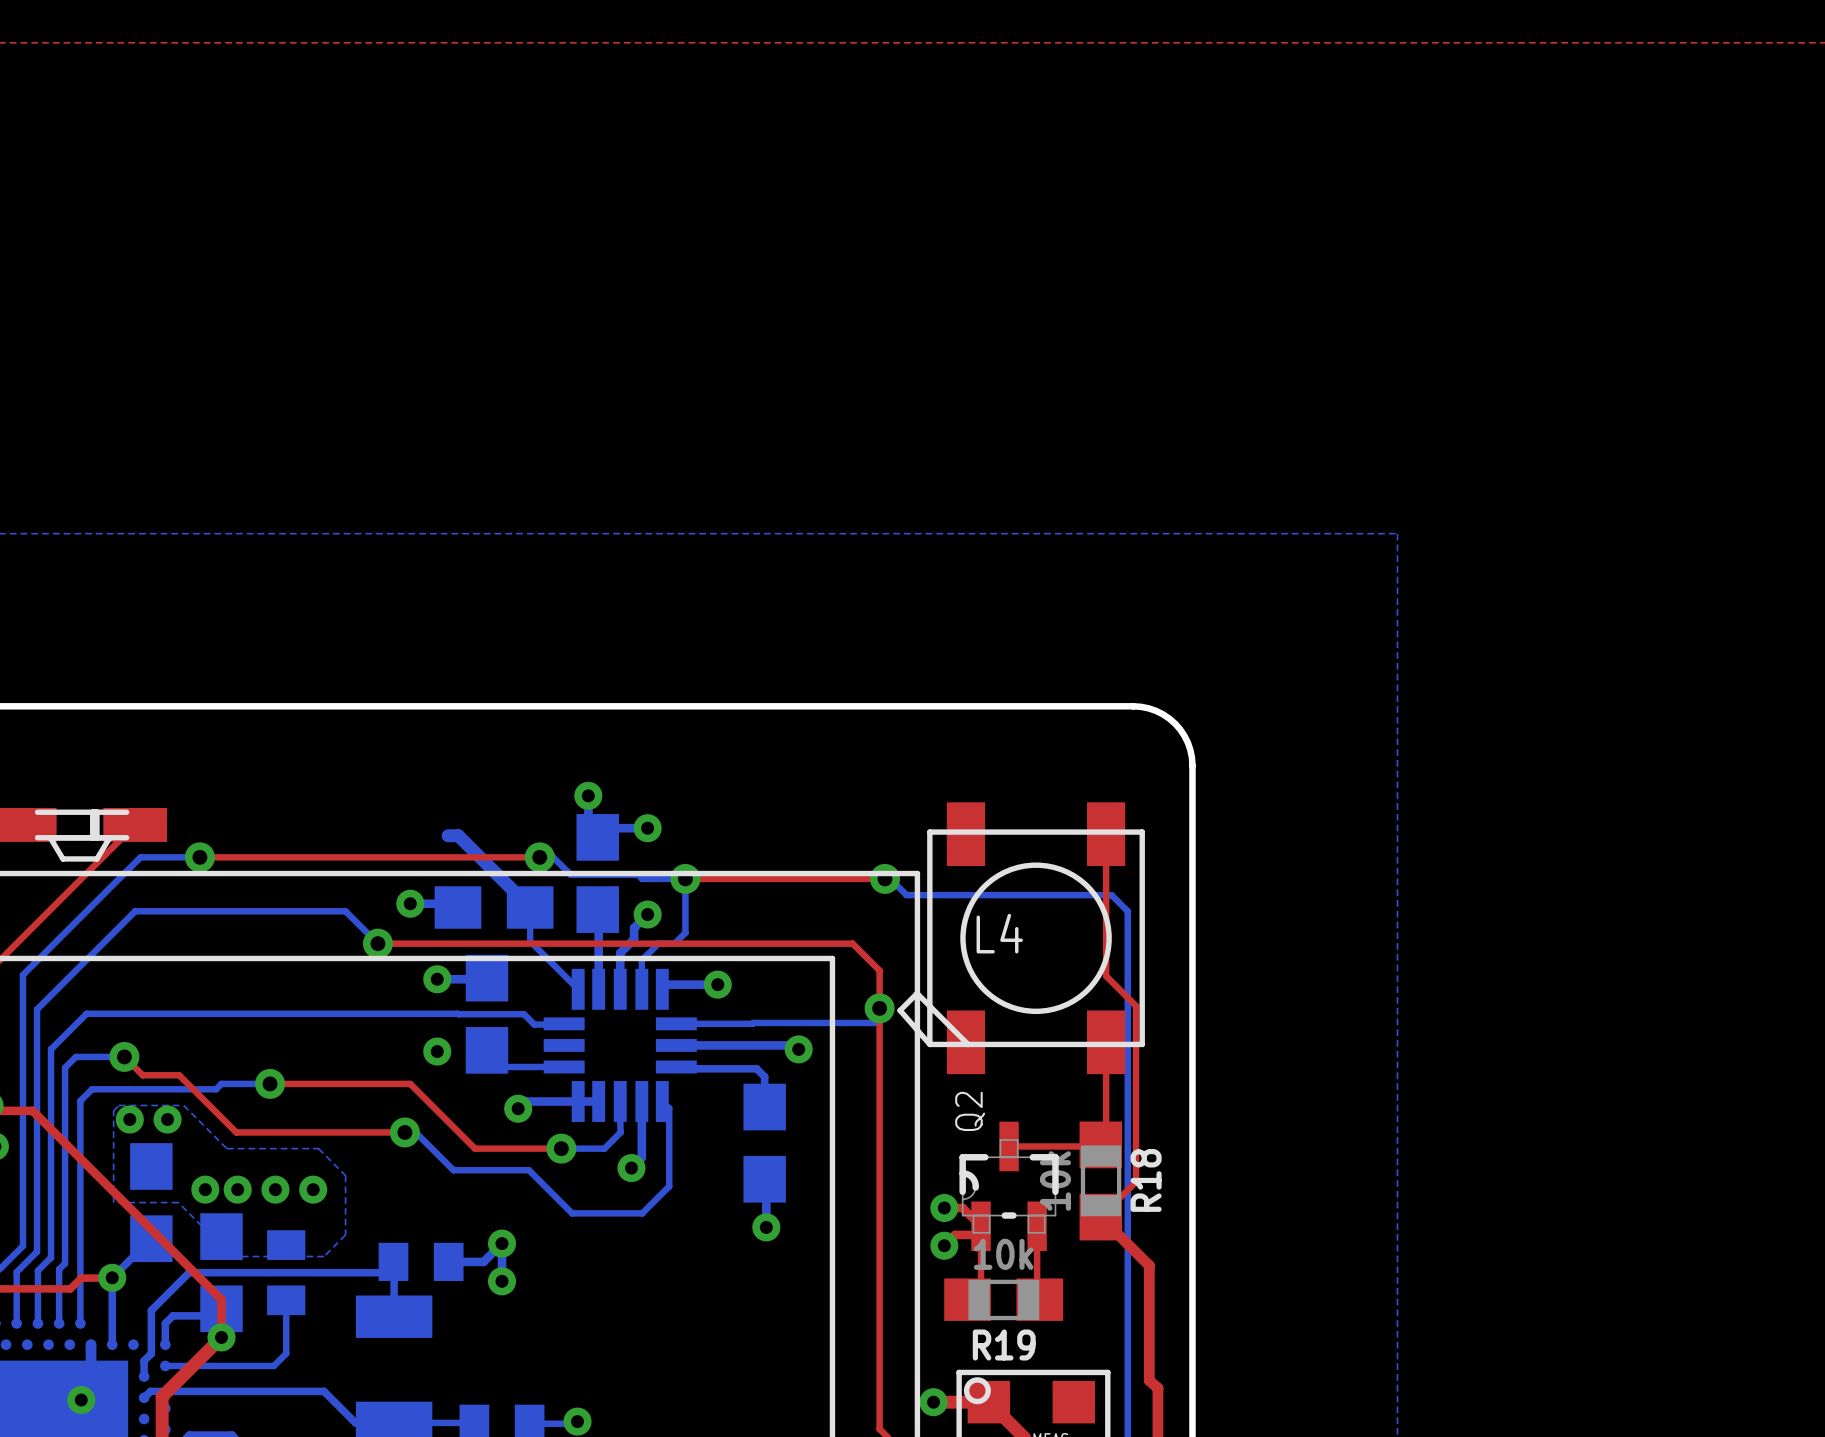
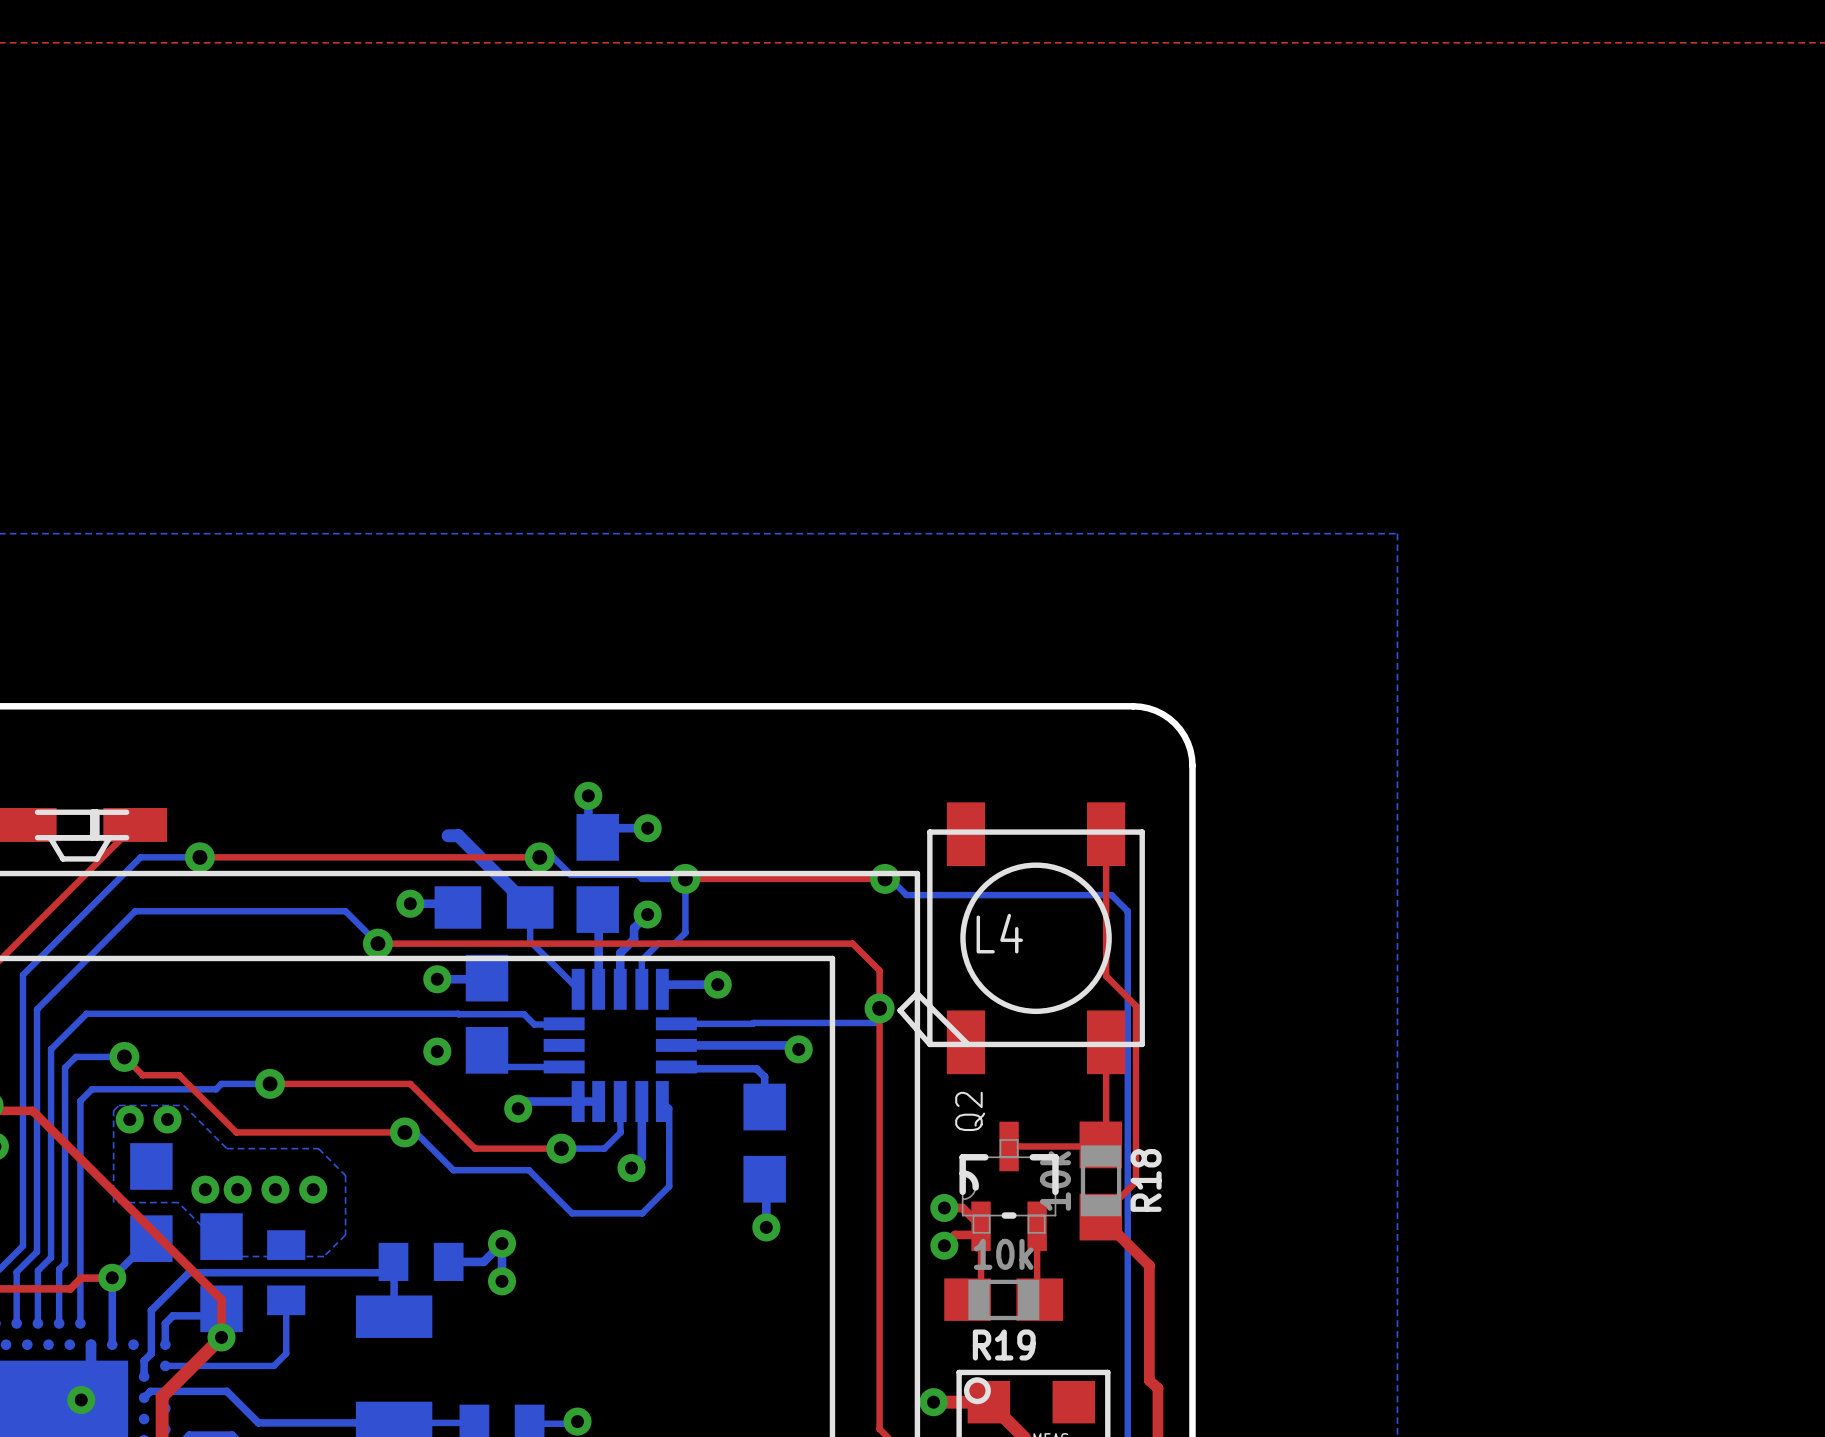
bottom track: (226, 1391) (323, 1391) (355, 1422) -> (226, 1391) (258, 1422) (355, 1422)

